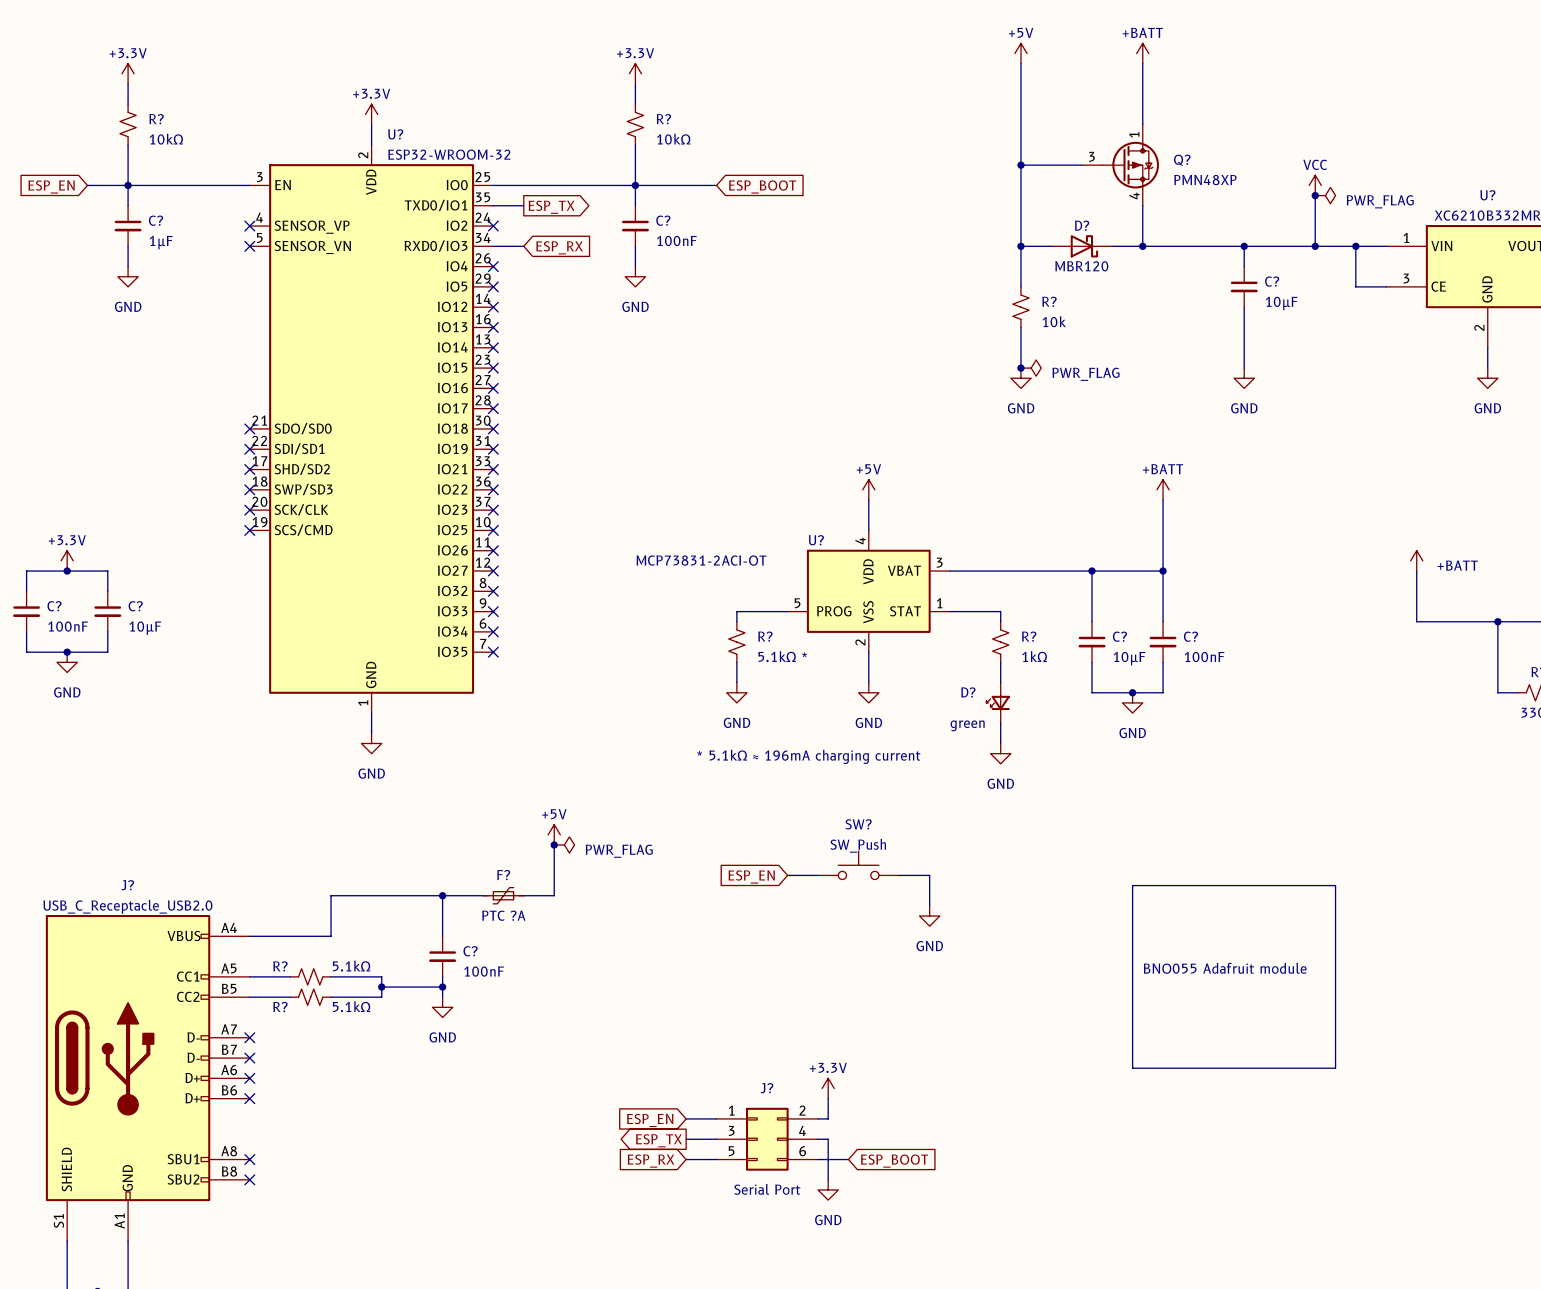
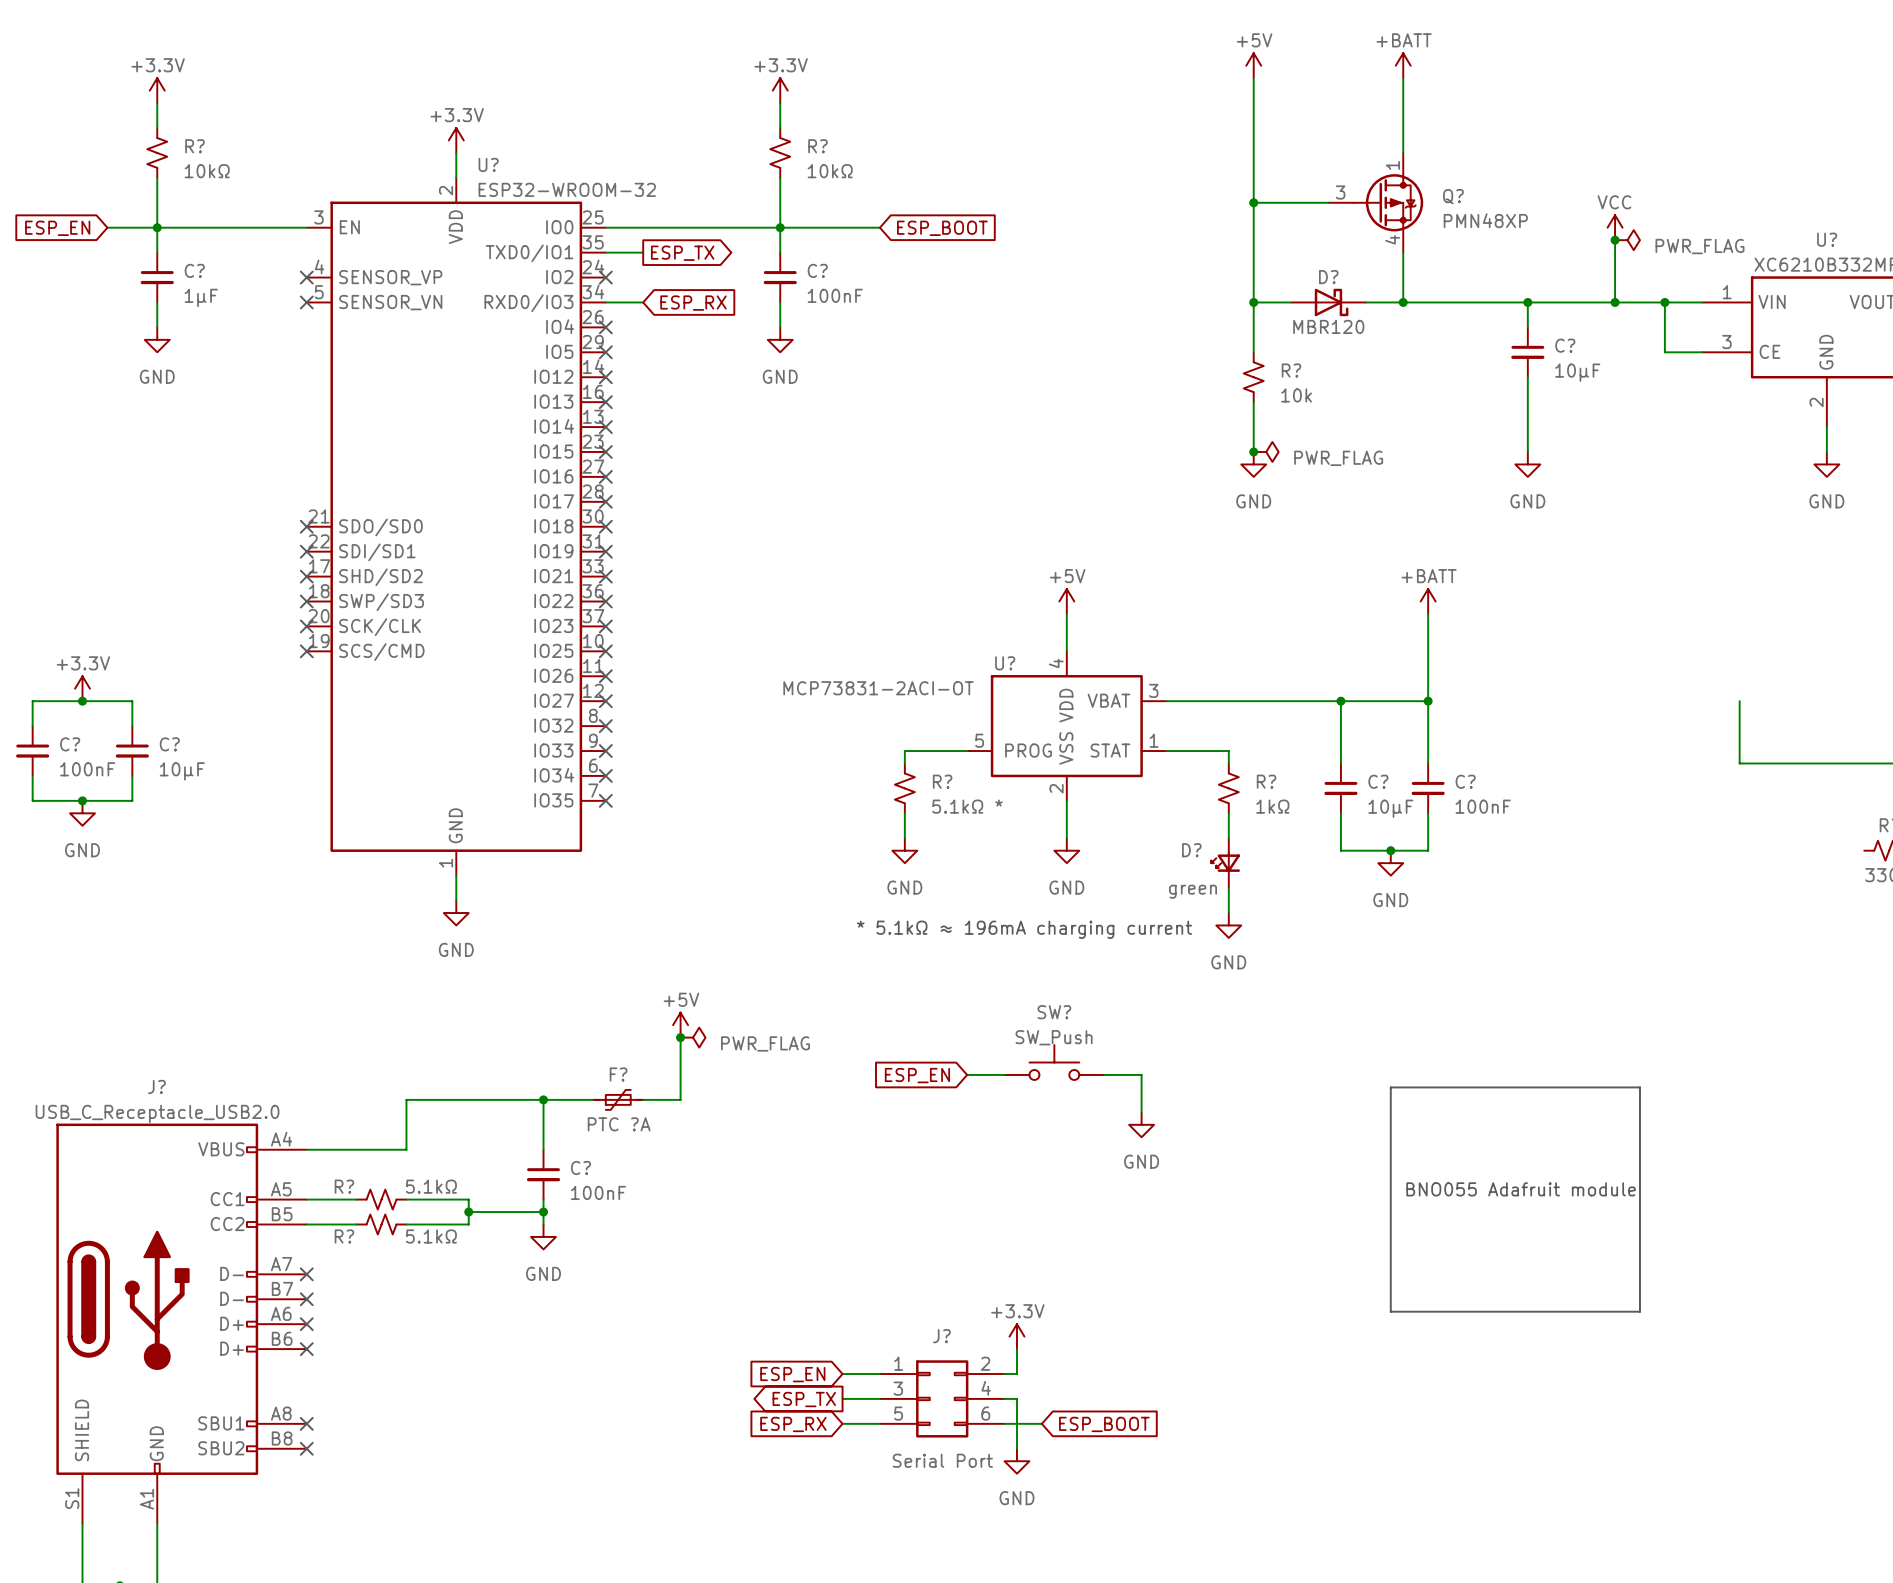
power symbol: +BATT (1416, 560) -> none
wire: (1497, 621) (1497, 692) (1518, 692) -> none
junction: (1497, 621) -> none

